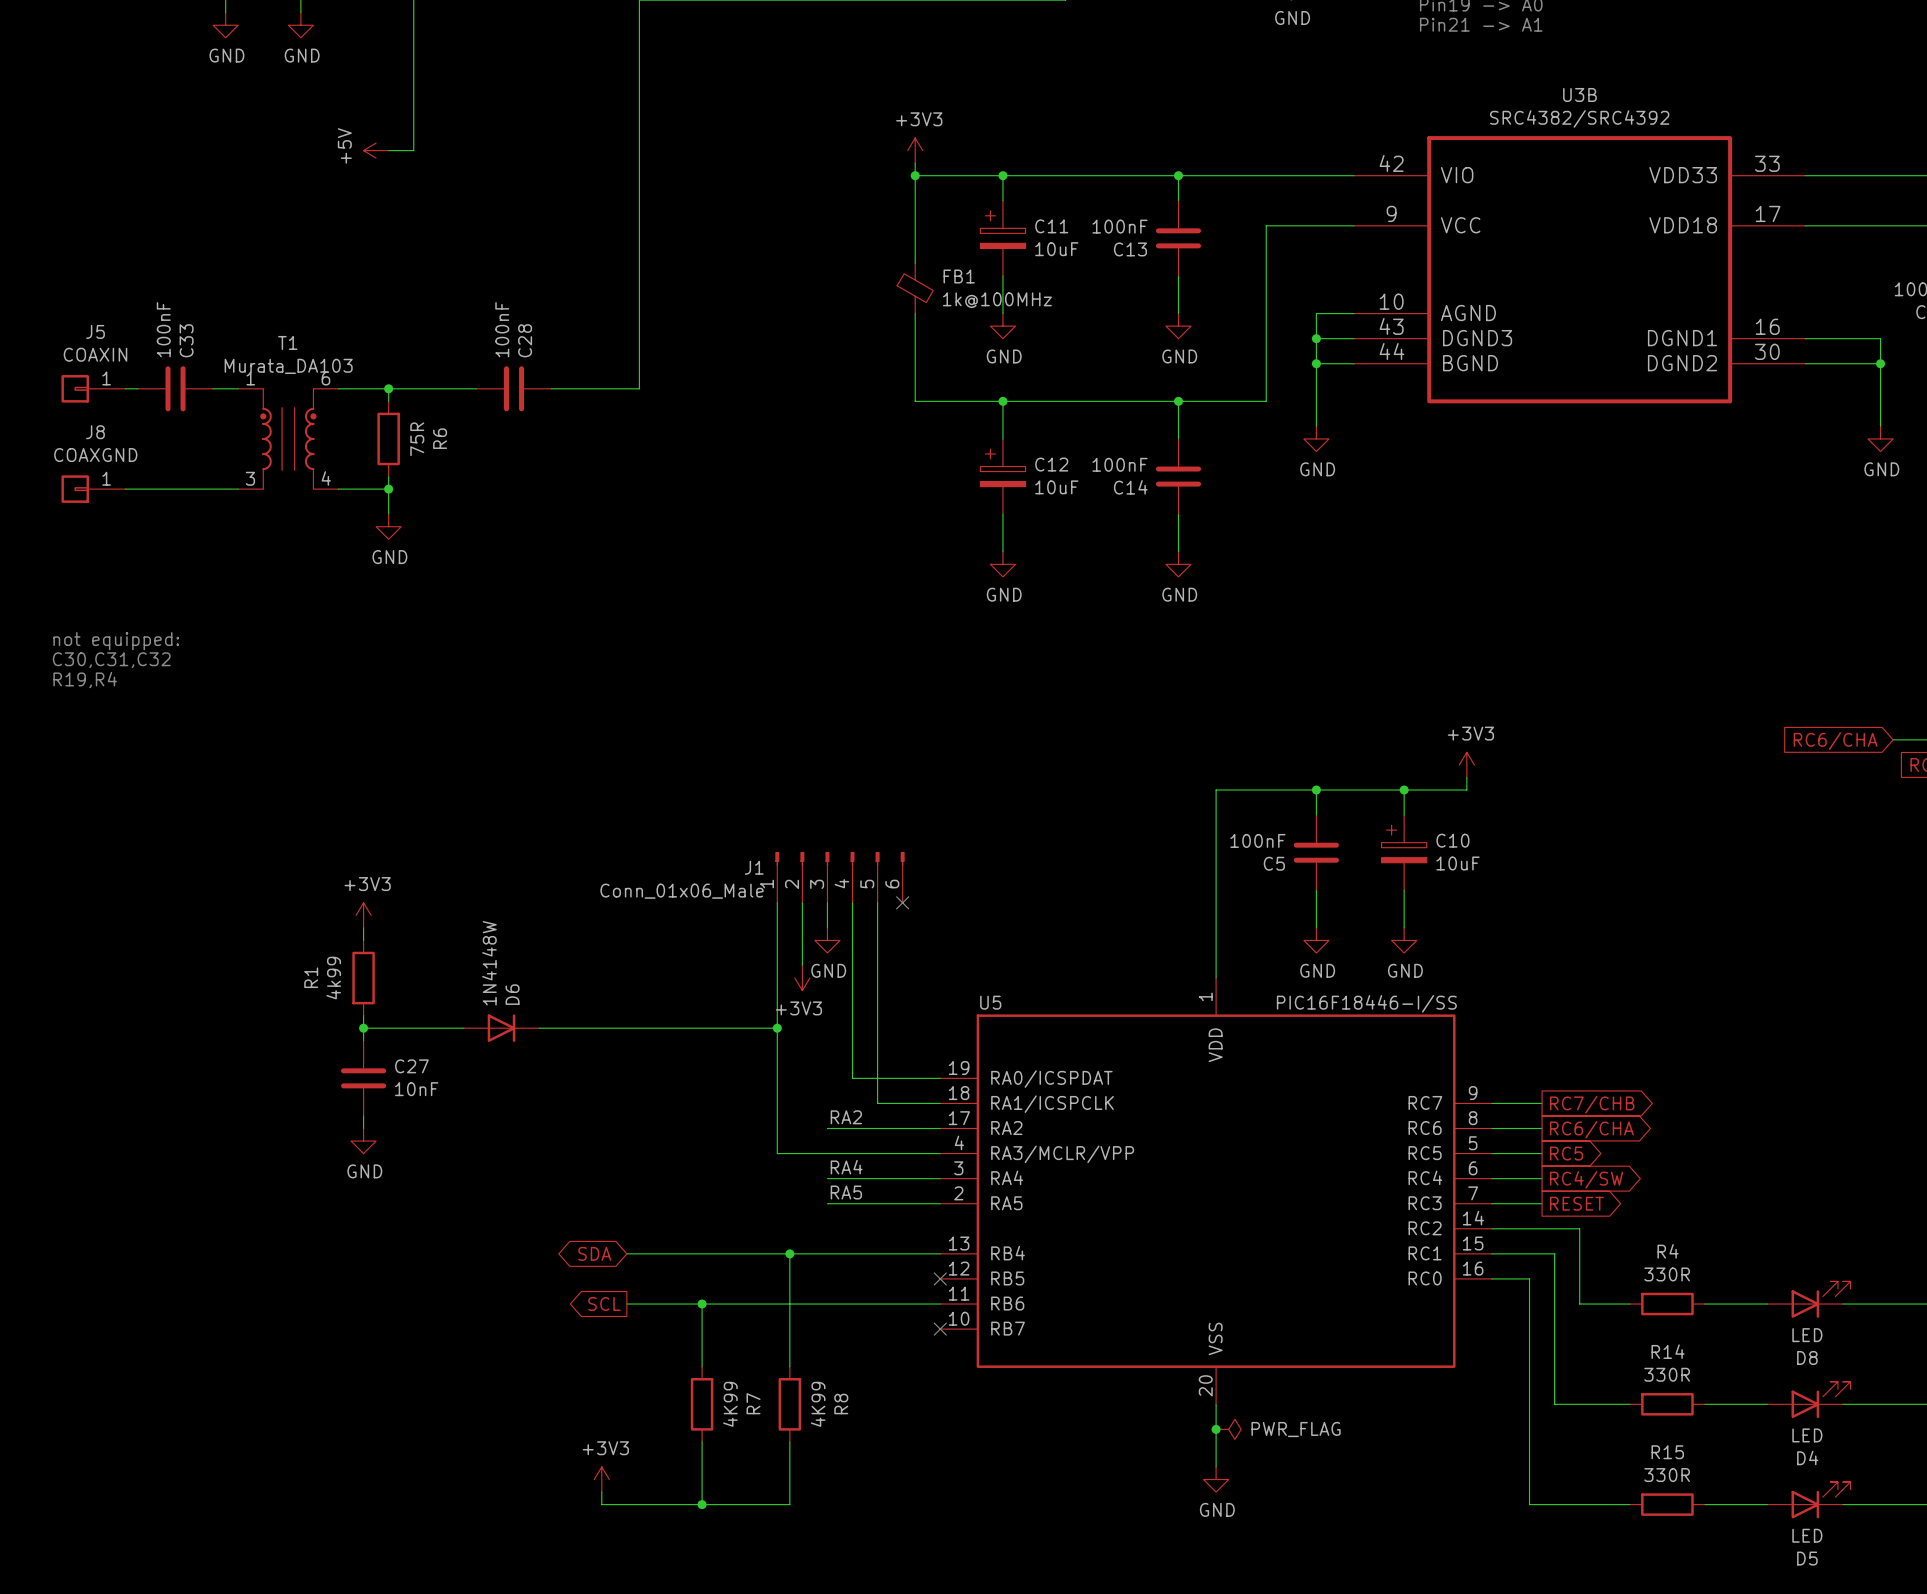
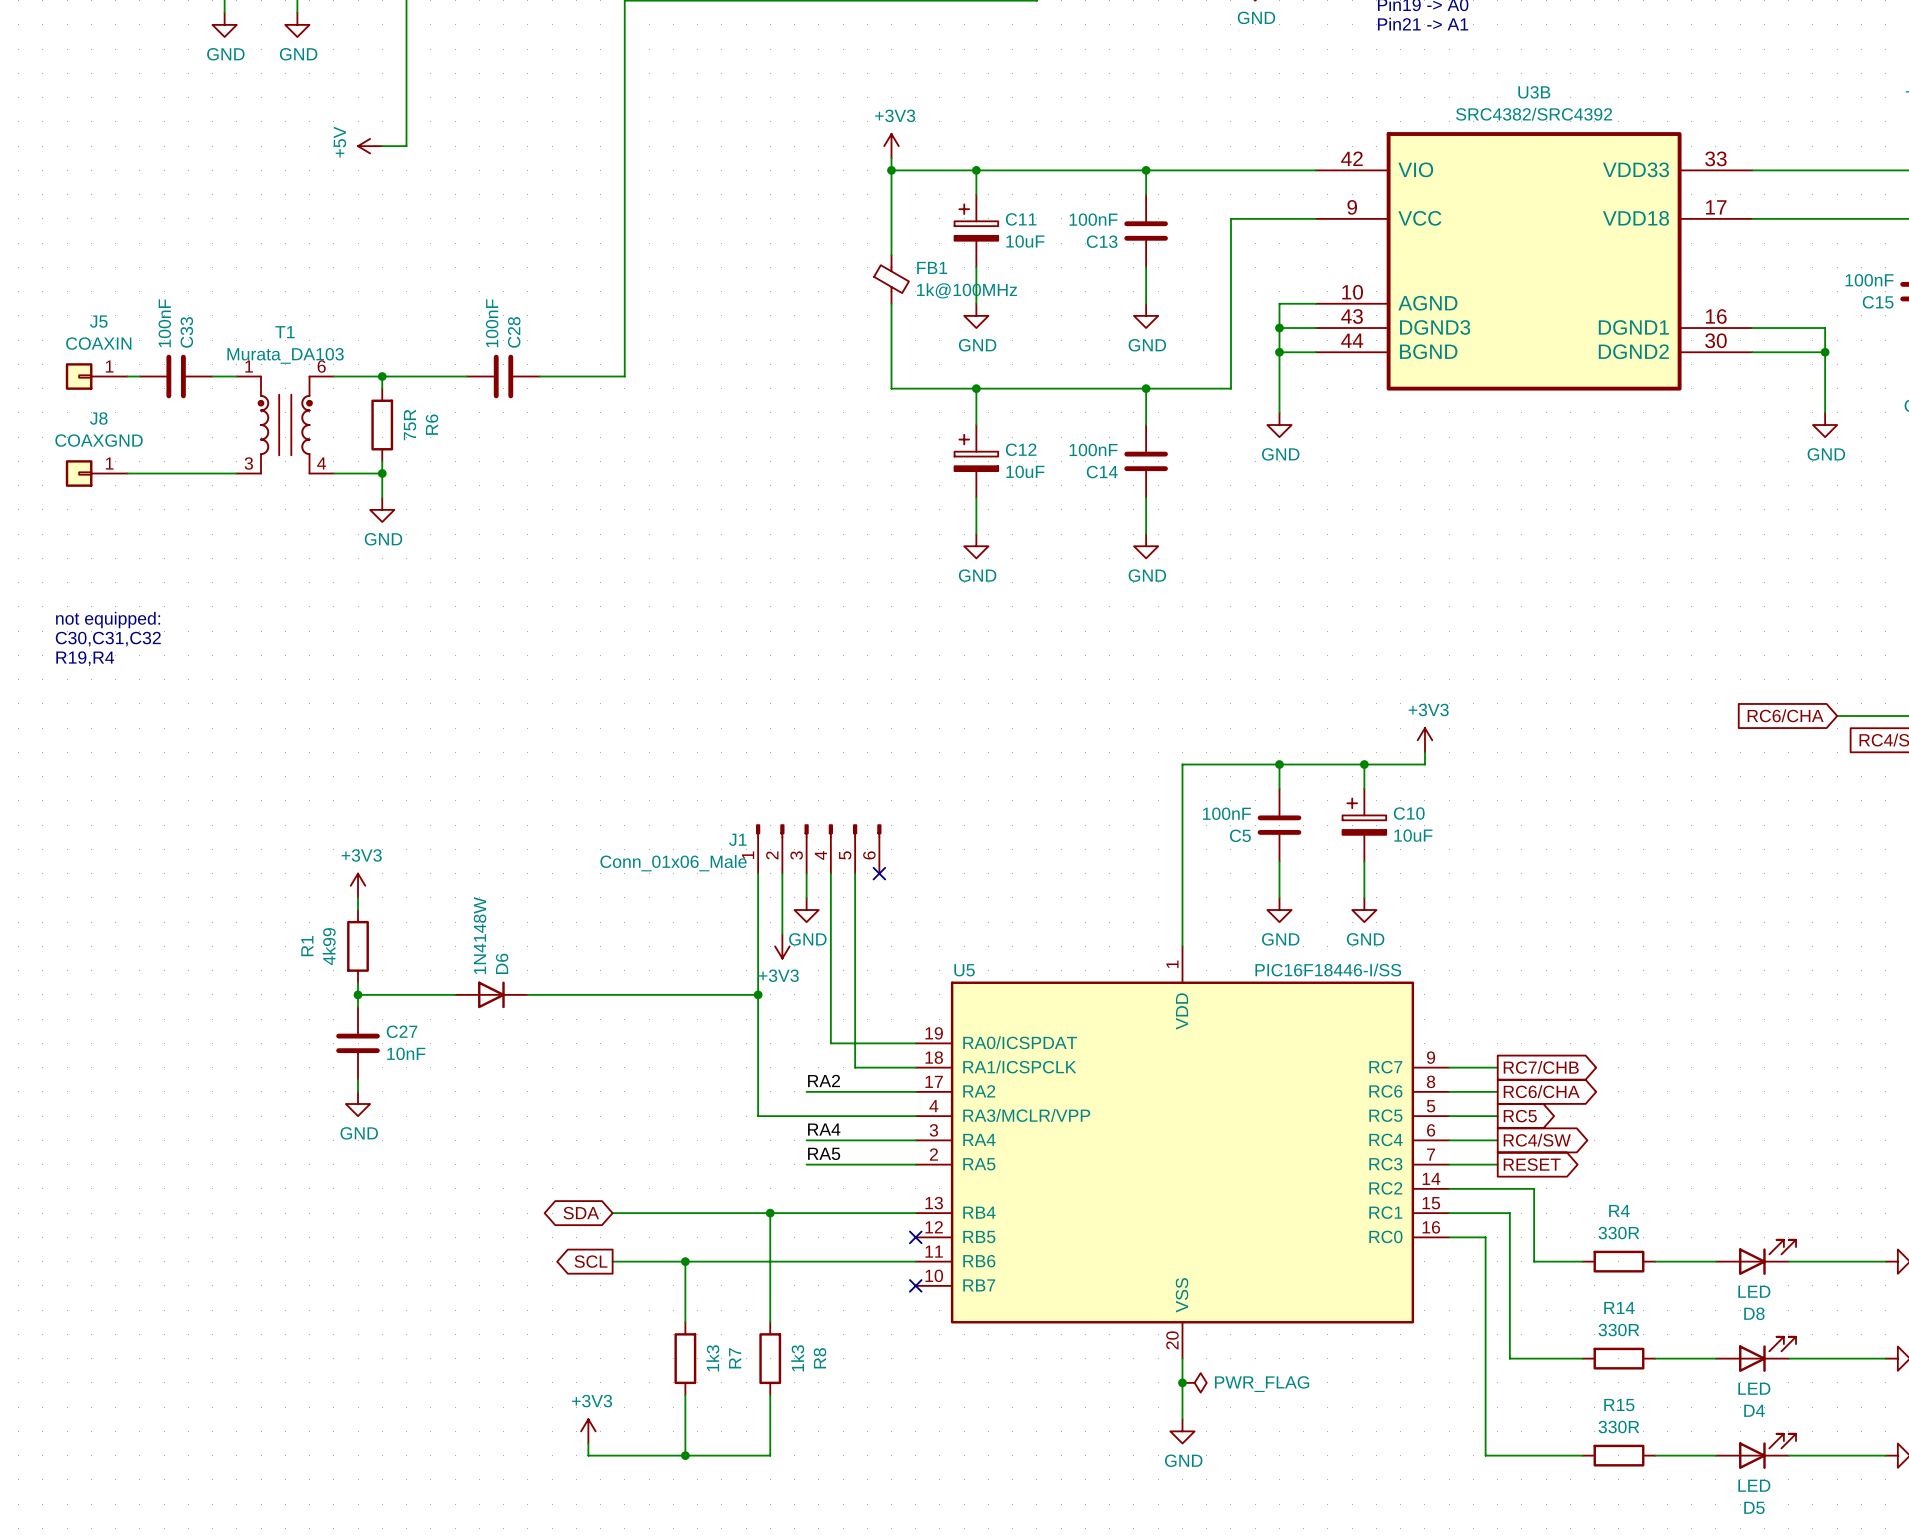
R7 value: 4K99 (730, 1404) -> 1k3 (712, 1358)
R8 value: 4K99 (818, 1404) -> 1k3 (797, 1358)

